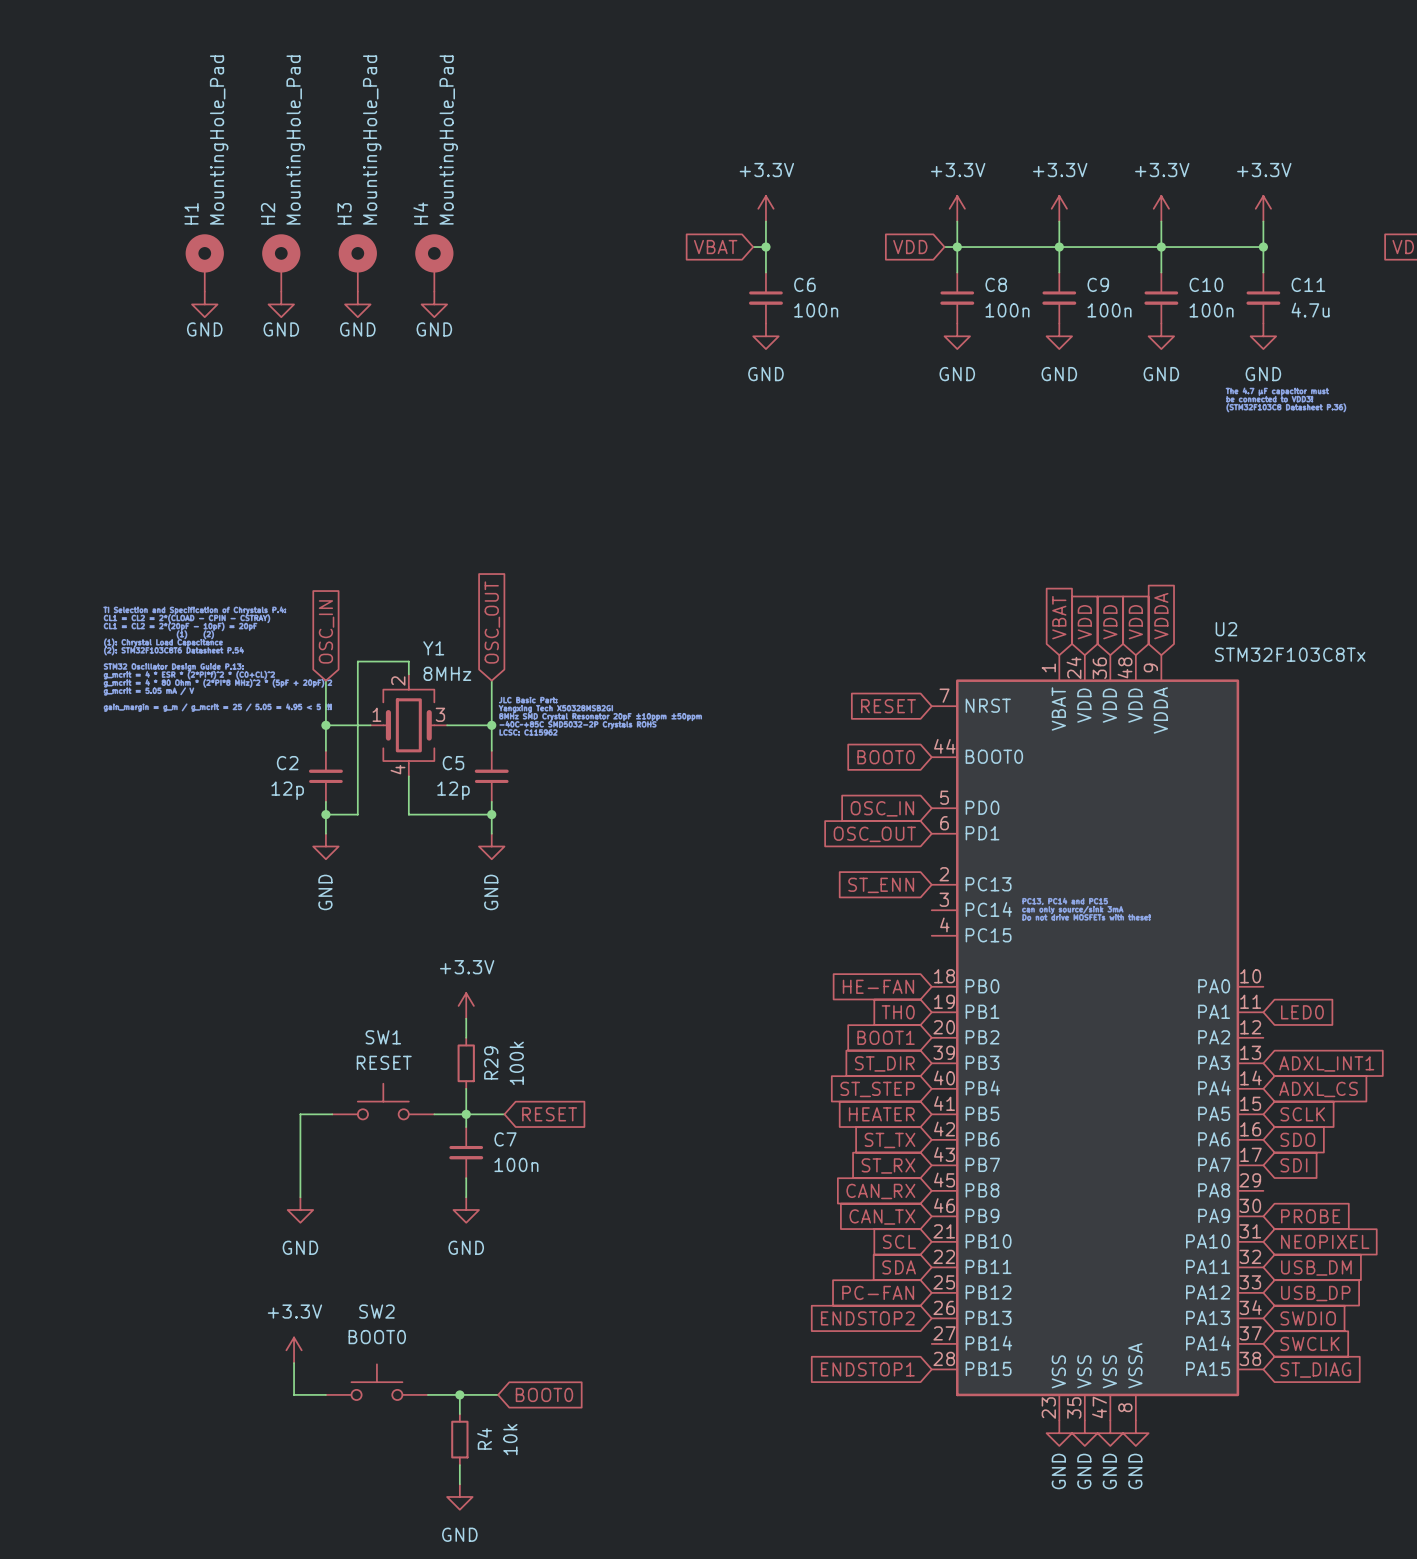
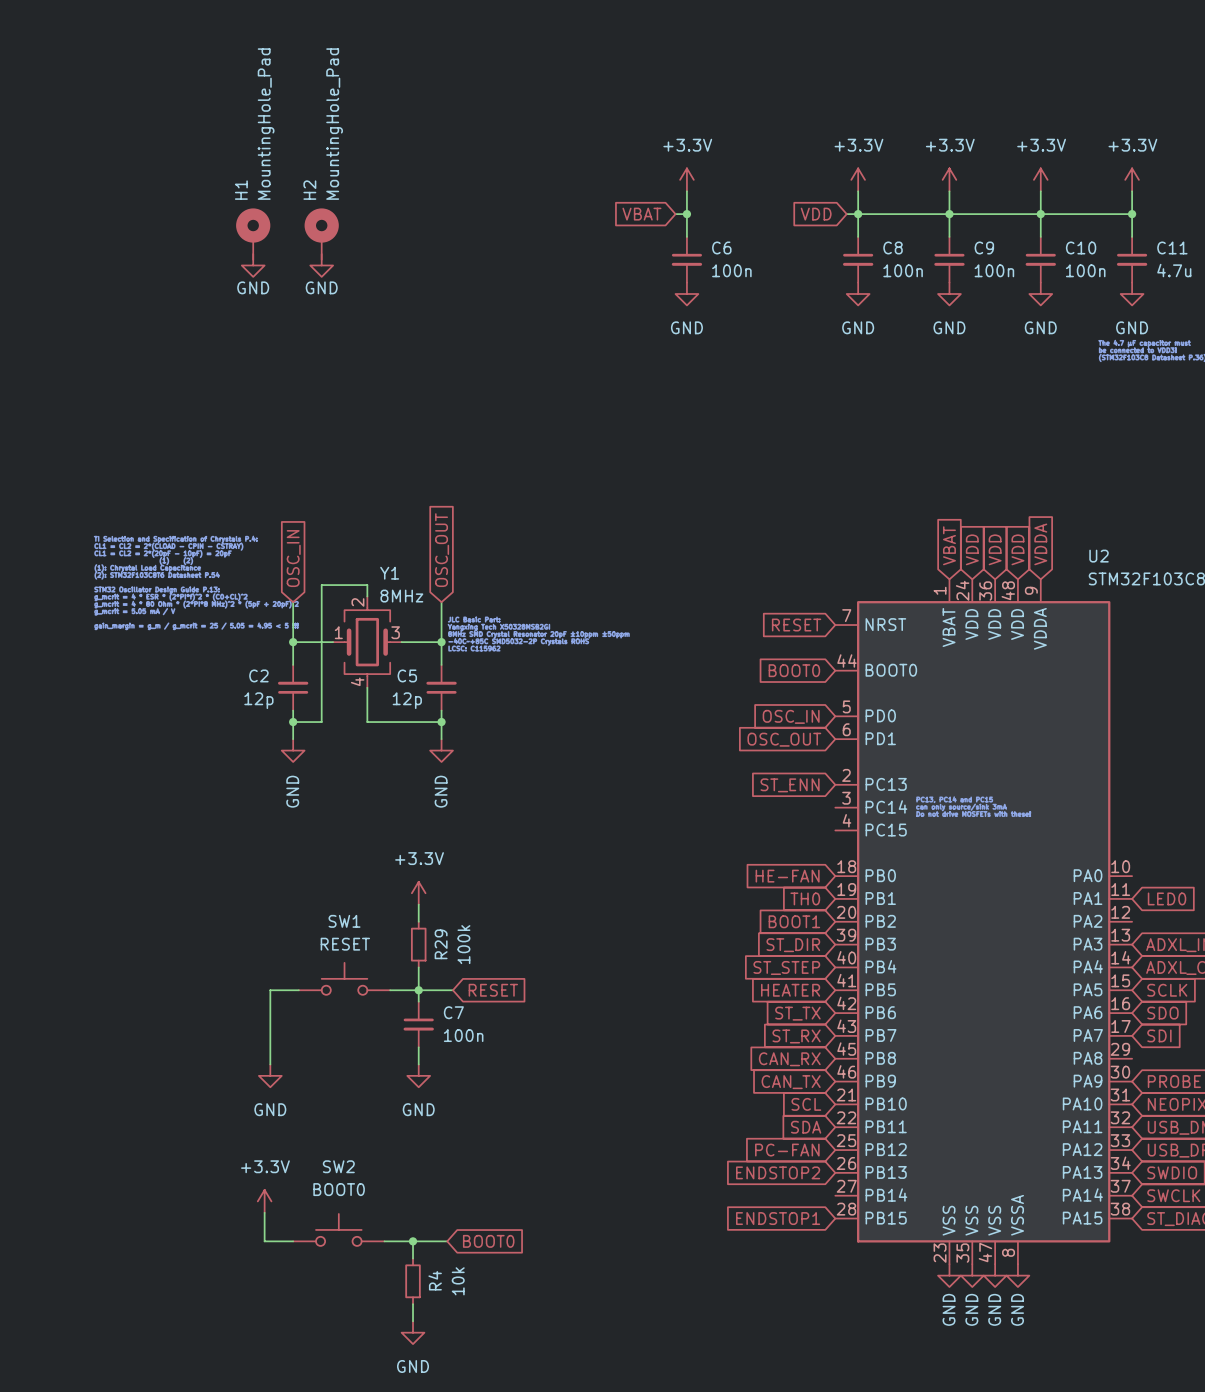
H1 position: (204, 262) -> (253, 234)
H2 position: (281, 262) -> (321, 234)
H3: MountingHole_Pad (357, 262) -> none
H4: MountingHole_Pad (434, 262) -> none
power symbol: GND (204, 304) -> none
power symbol: GND (434, 304) -> none

